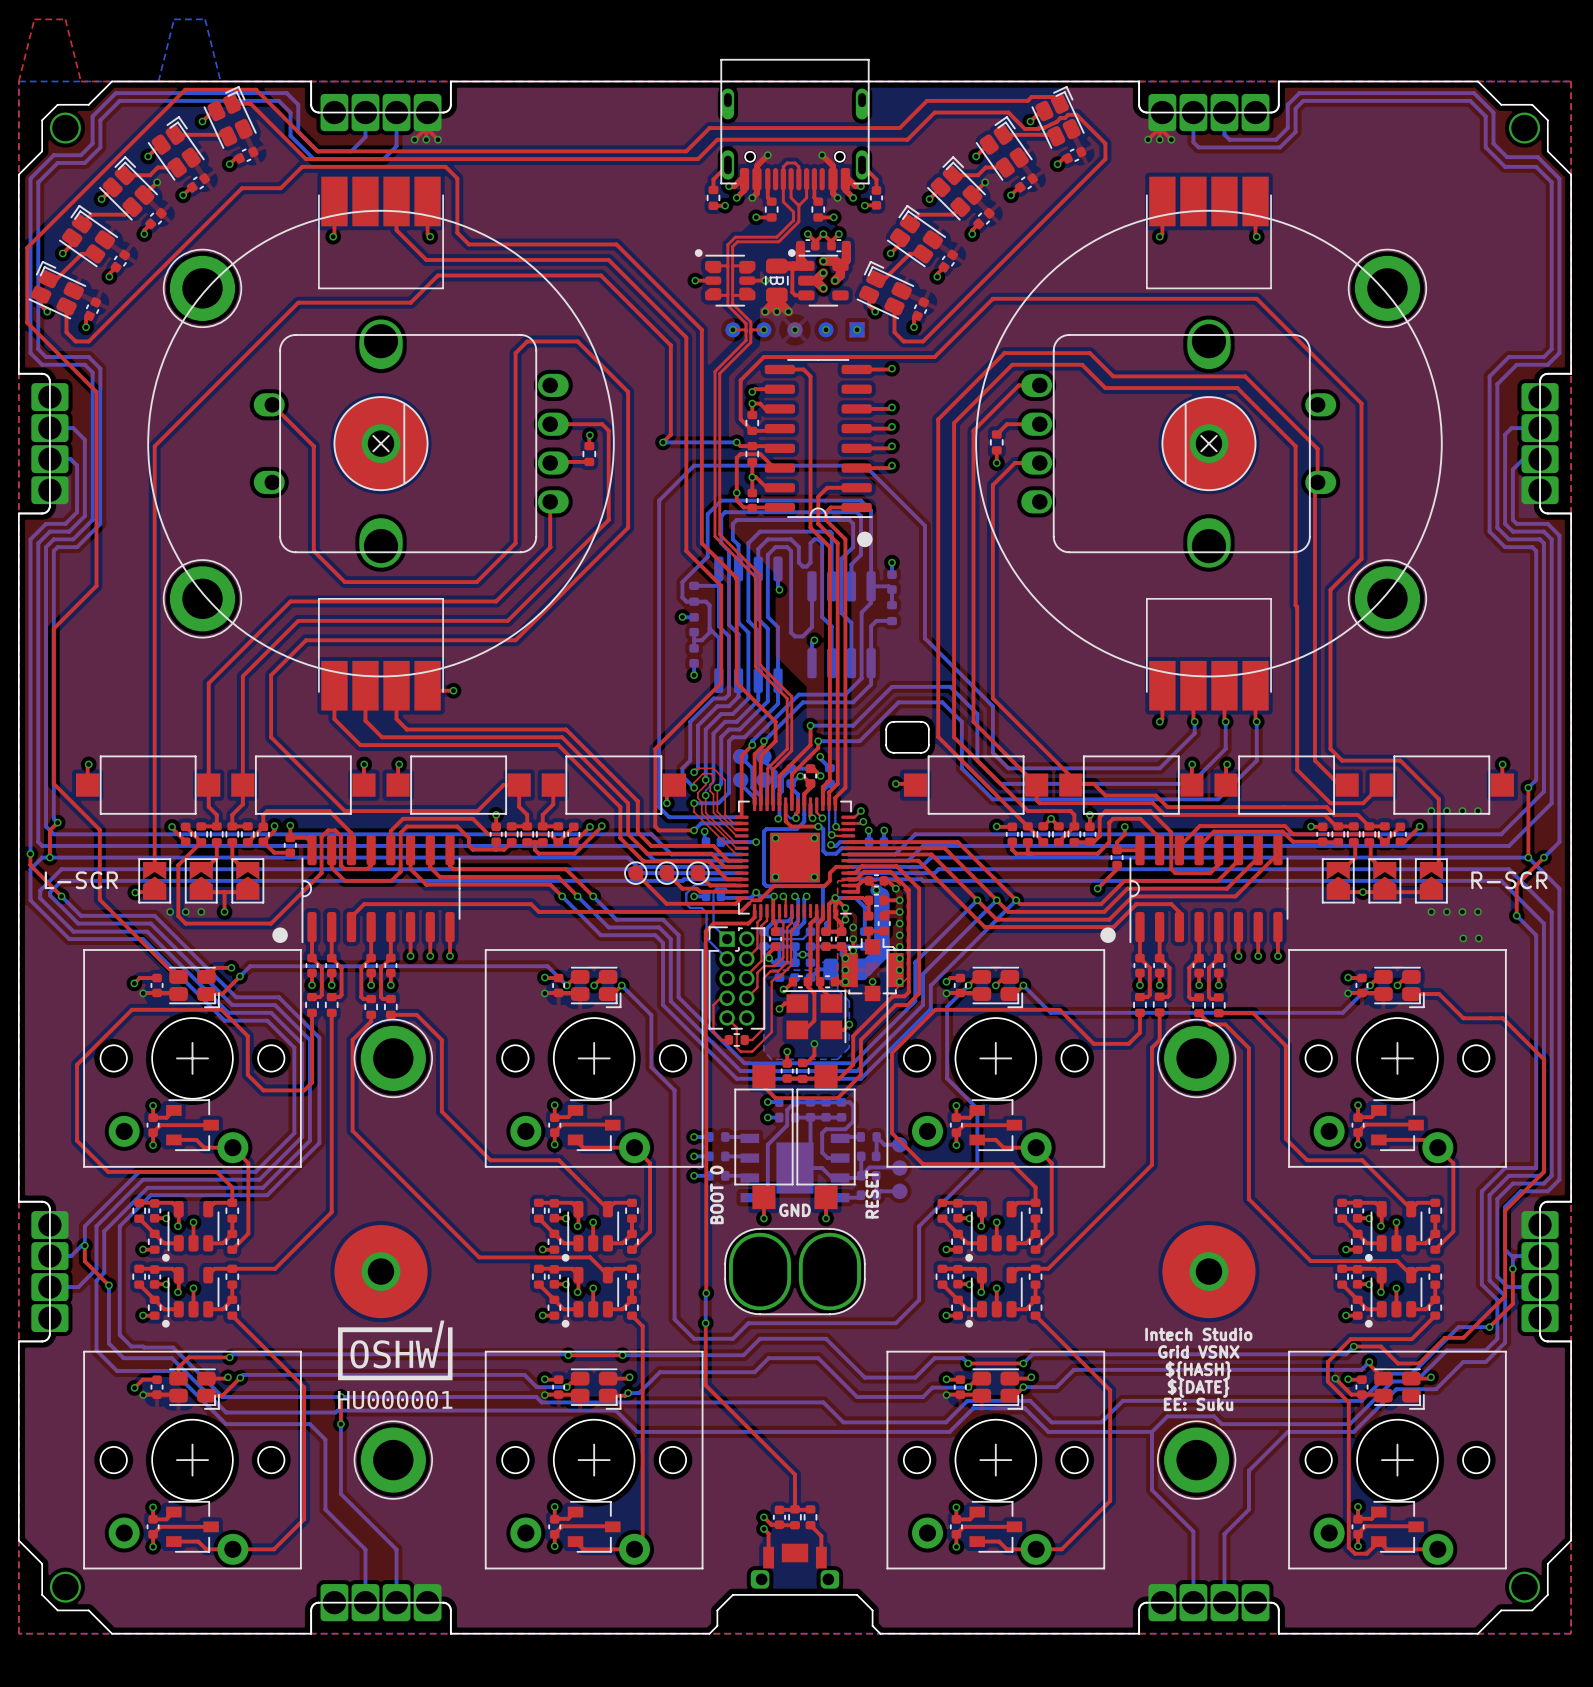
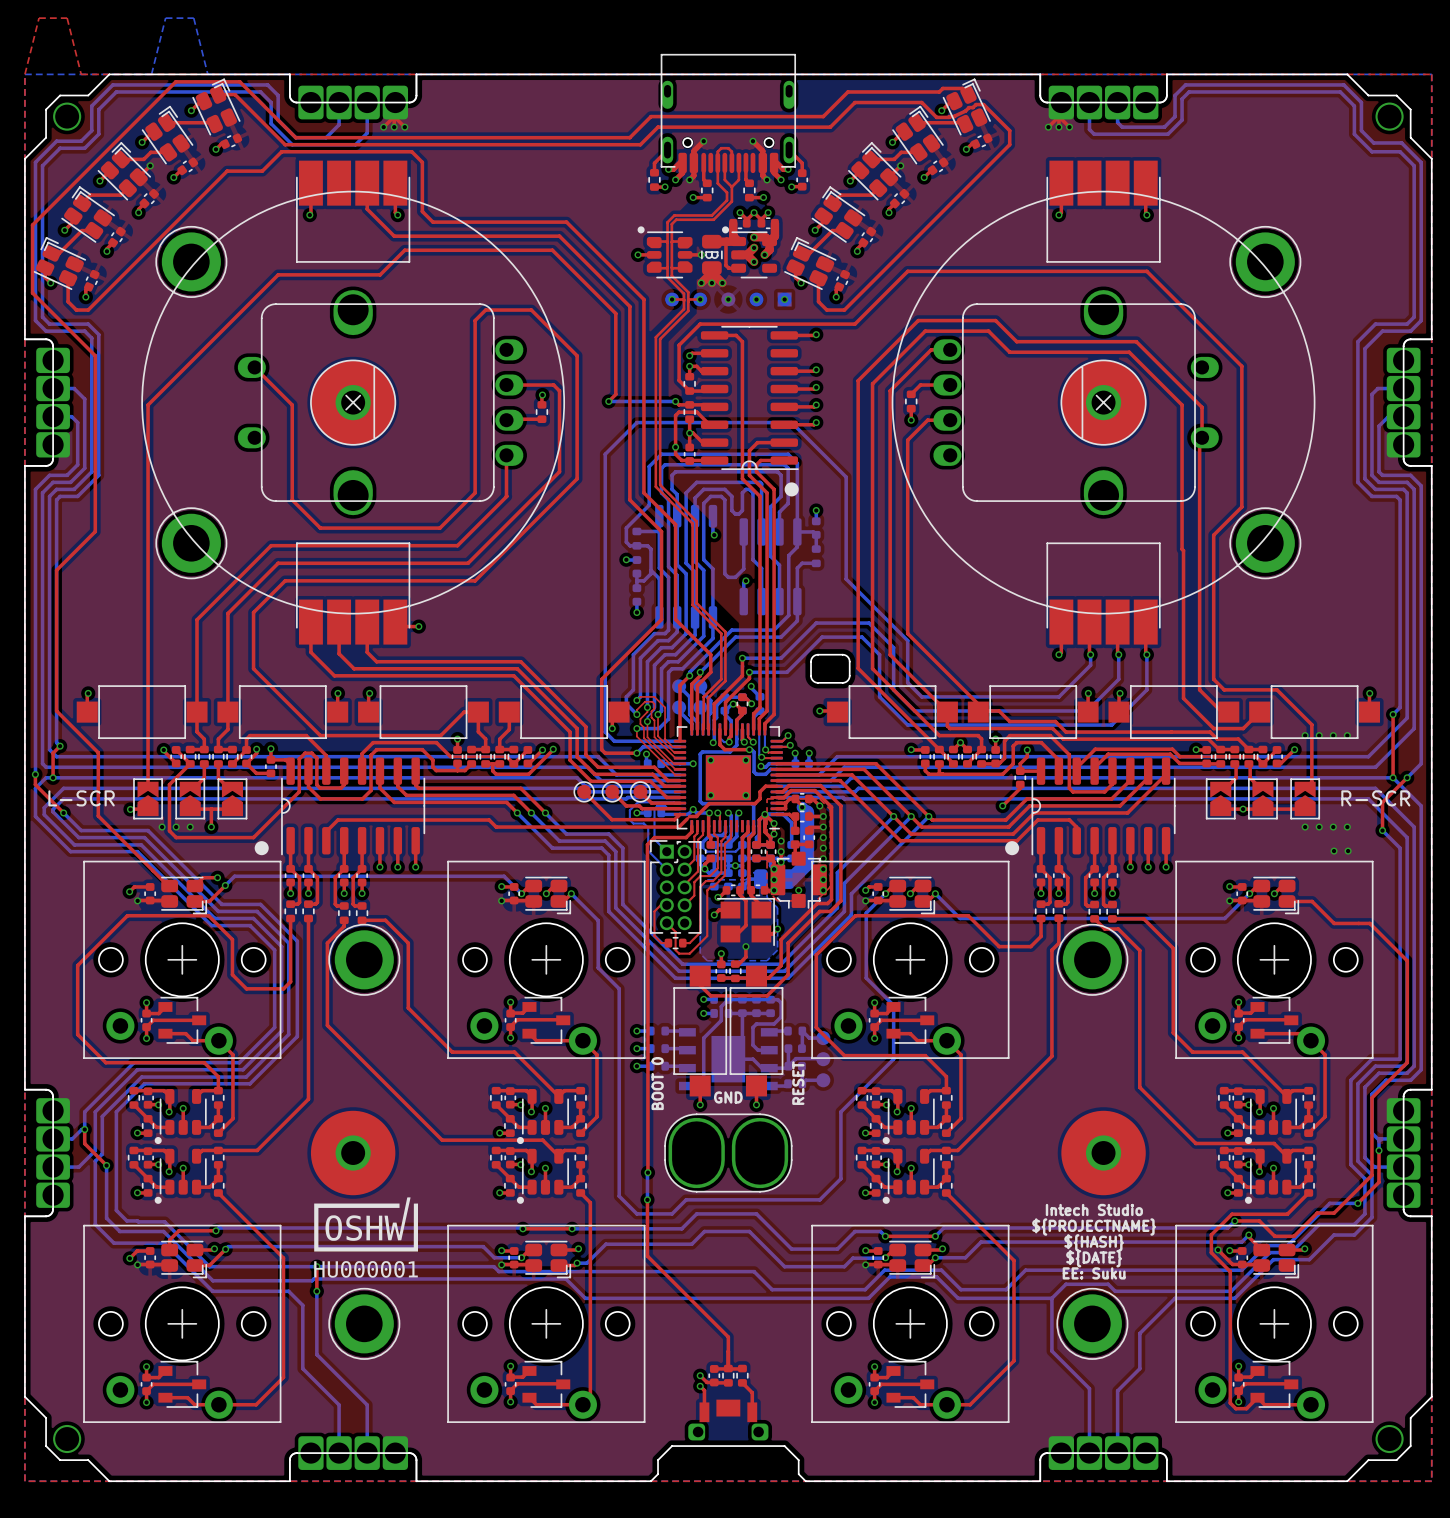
part footprint: [841, 938, 904, 1002] -> [770, 851, 827, 909]
text: Grid VSNX (1198, 1351) -> ${PROJECTNAME} (1094, 1227)

